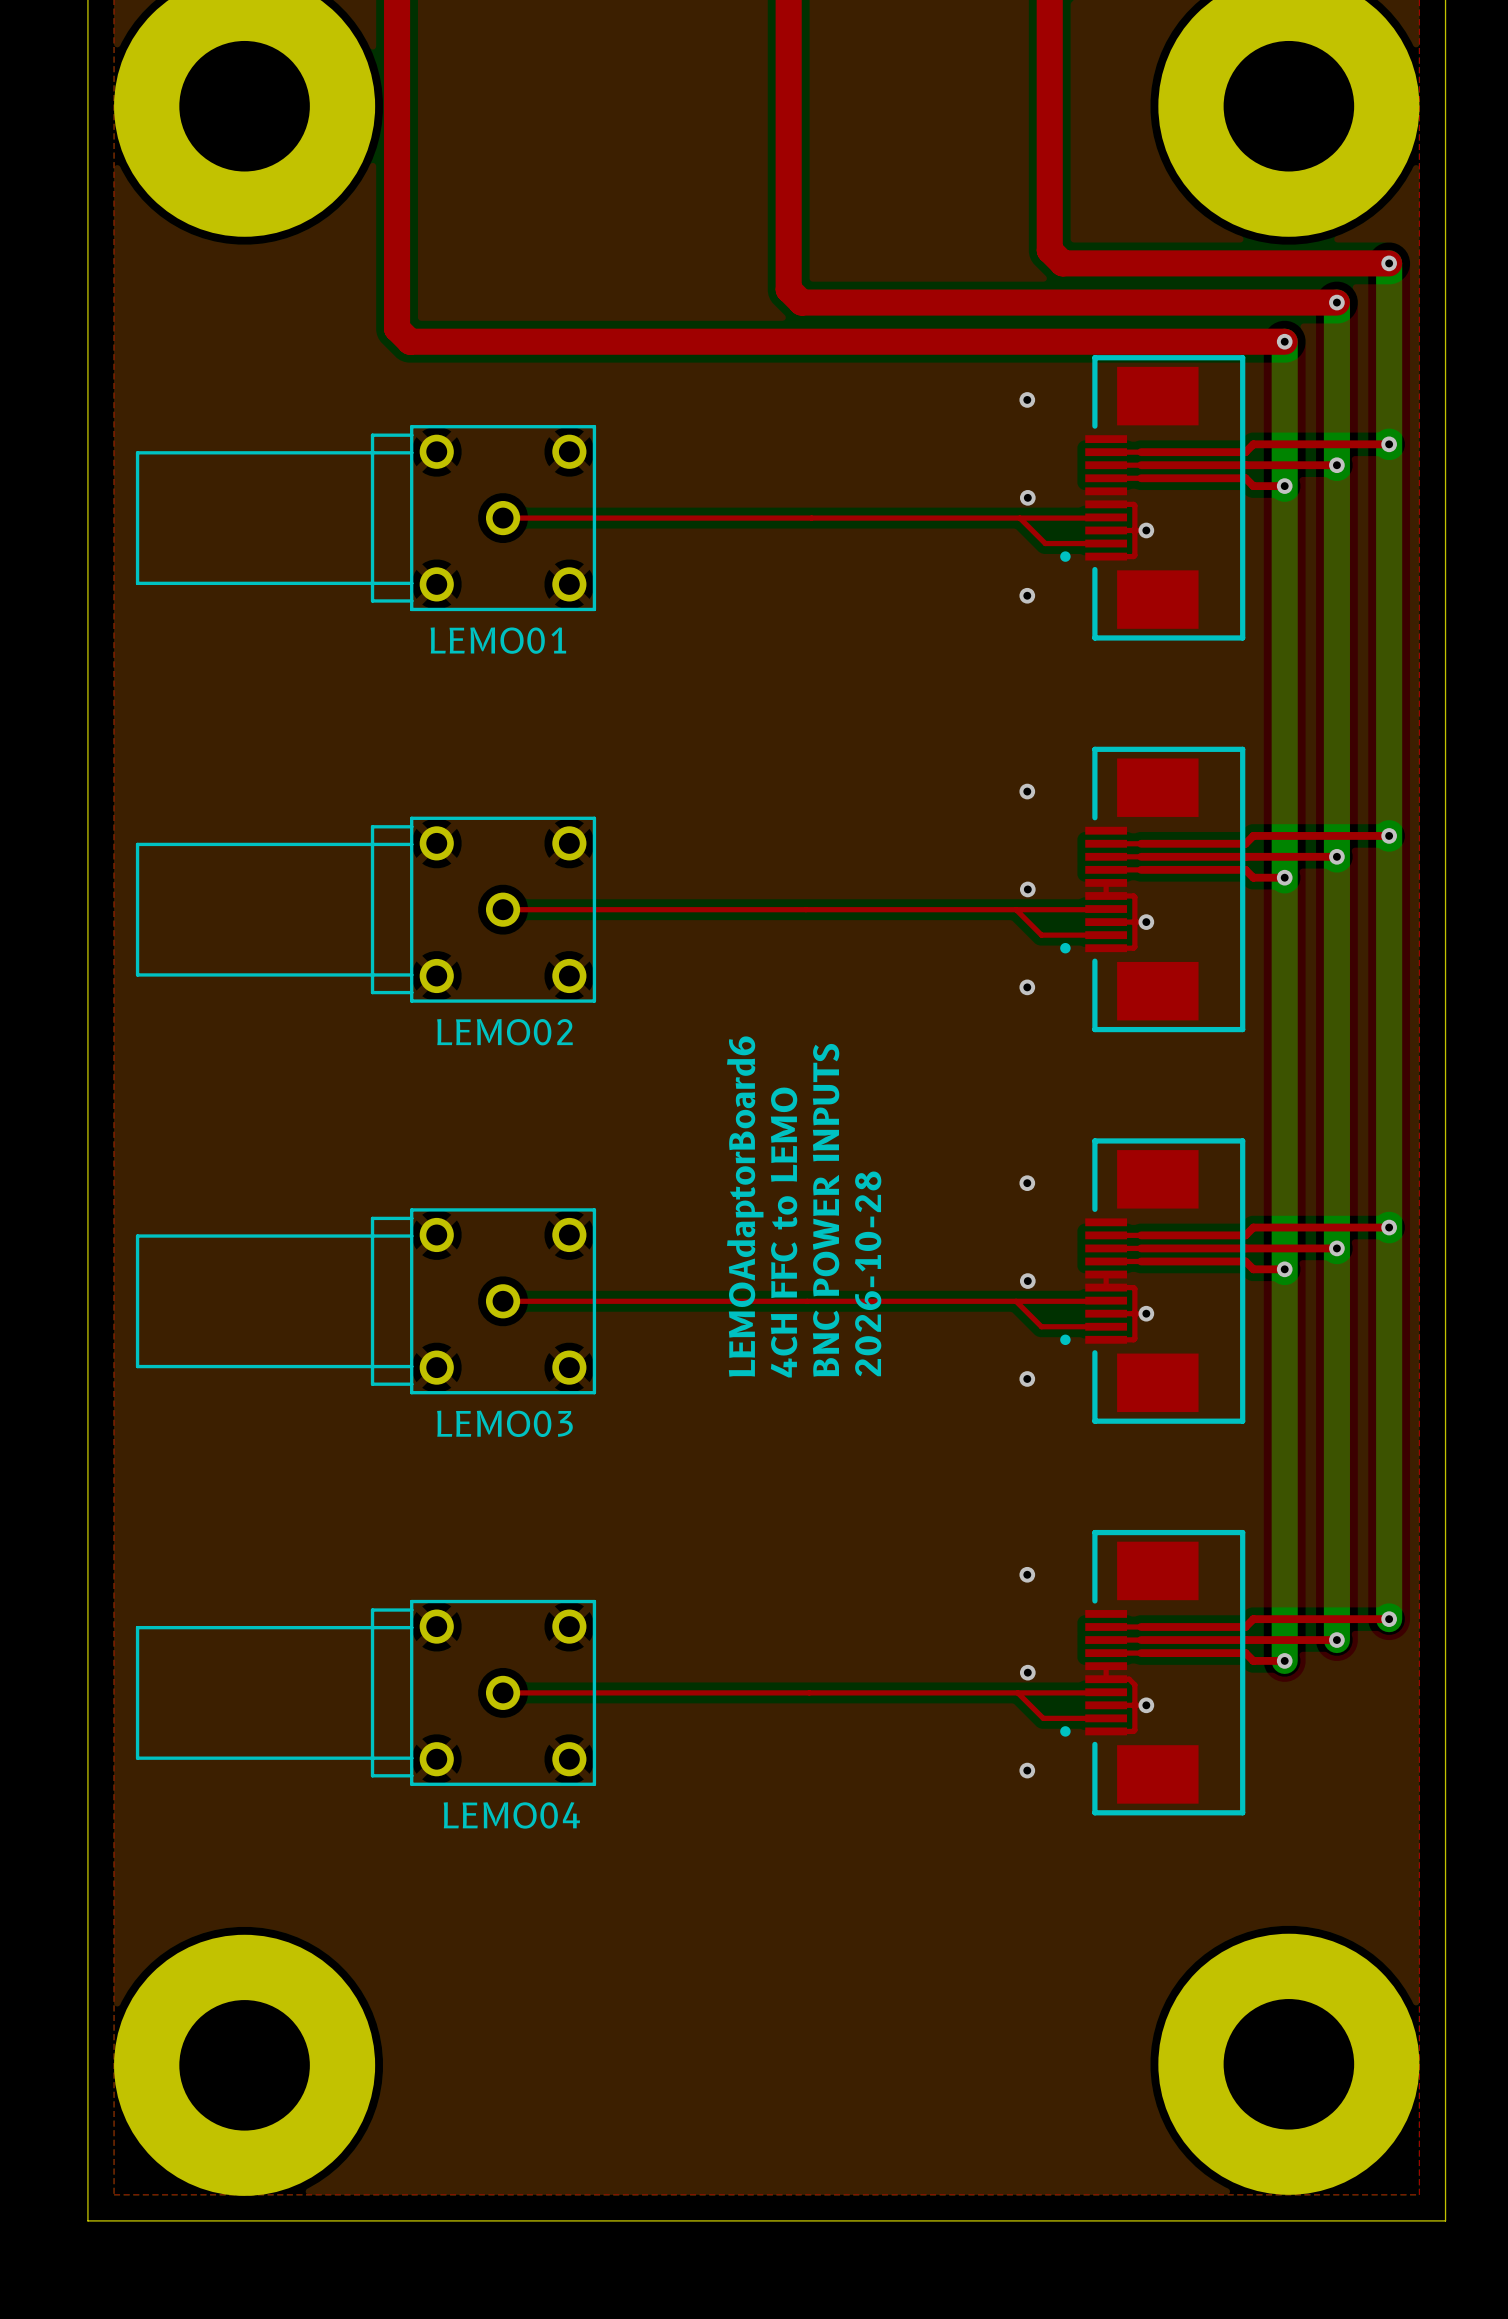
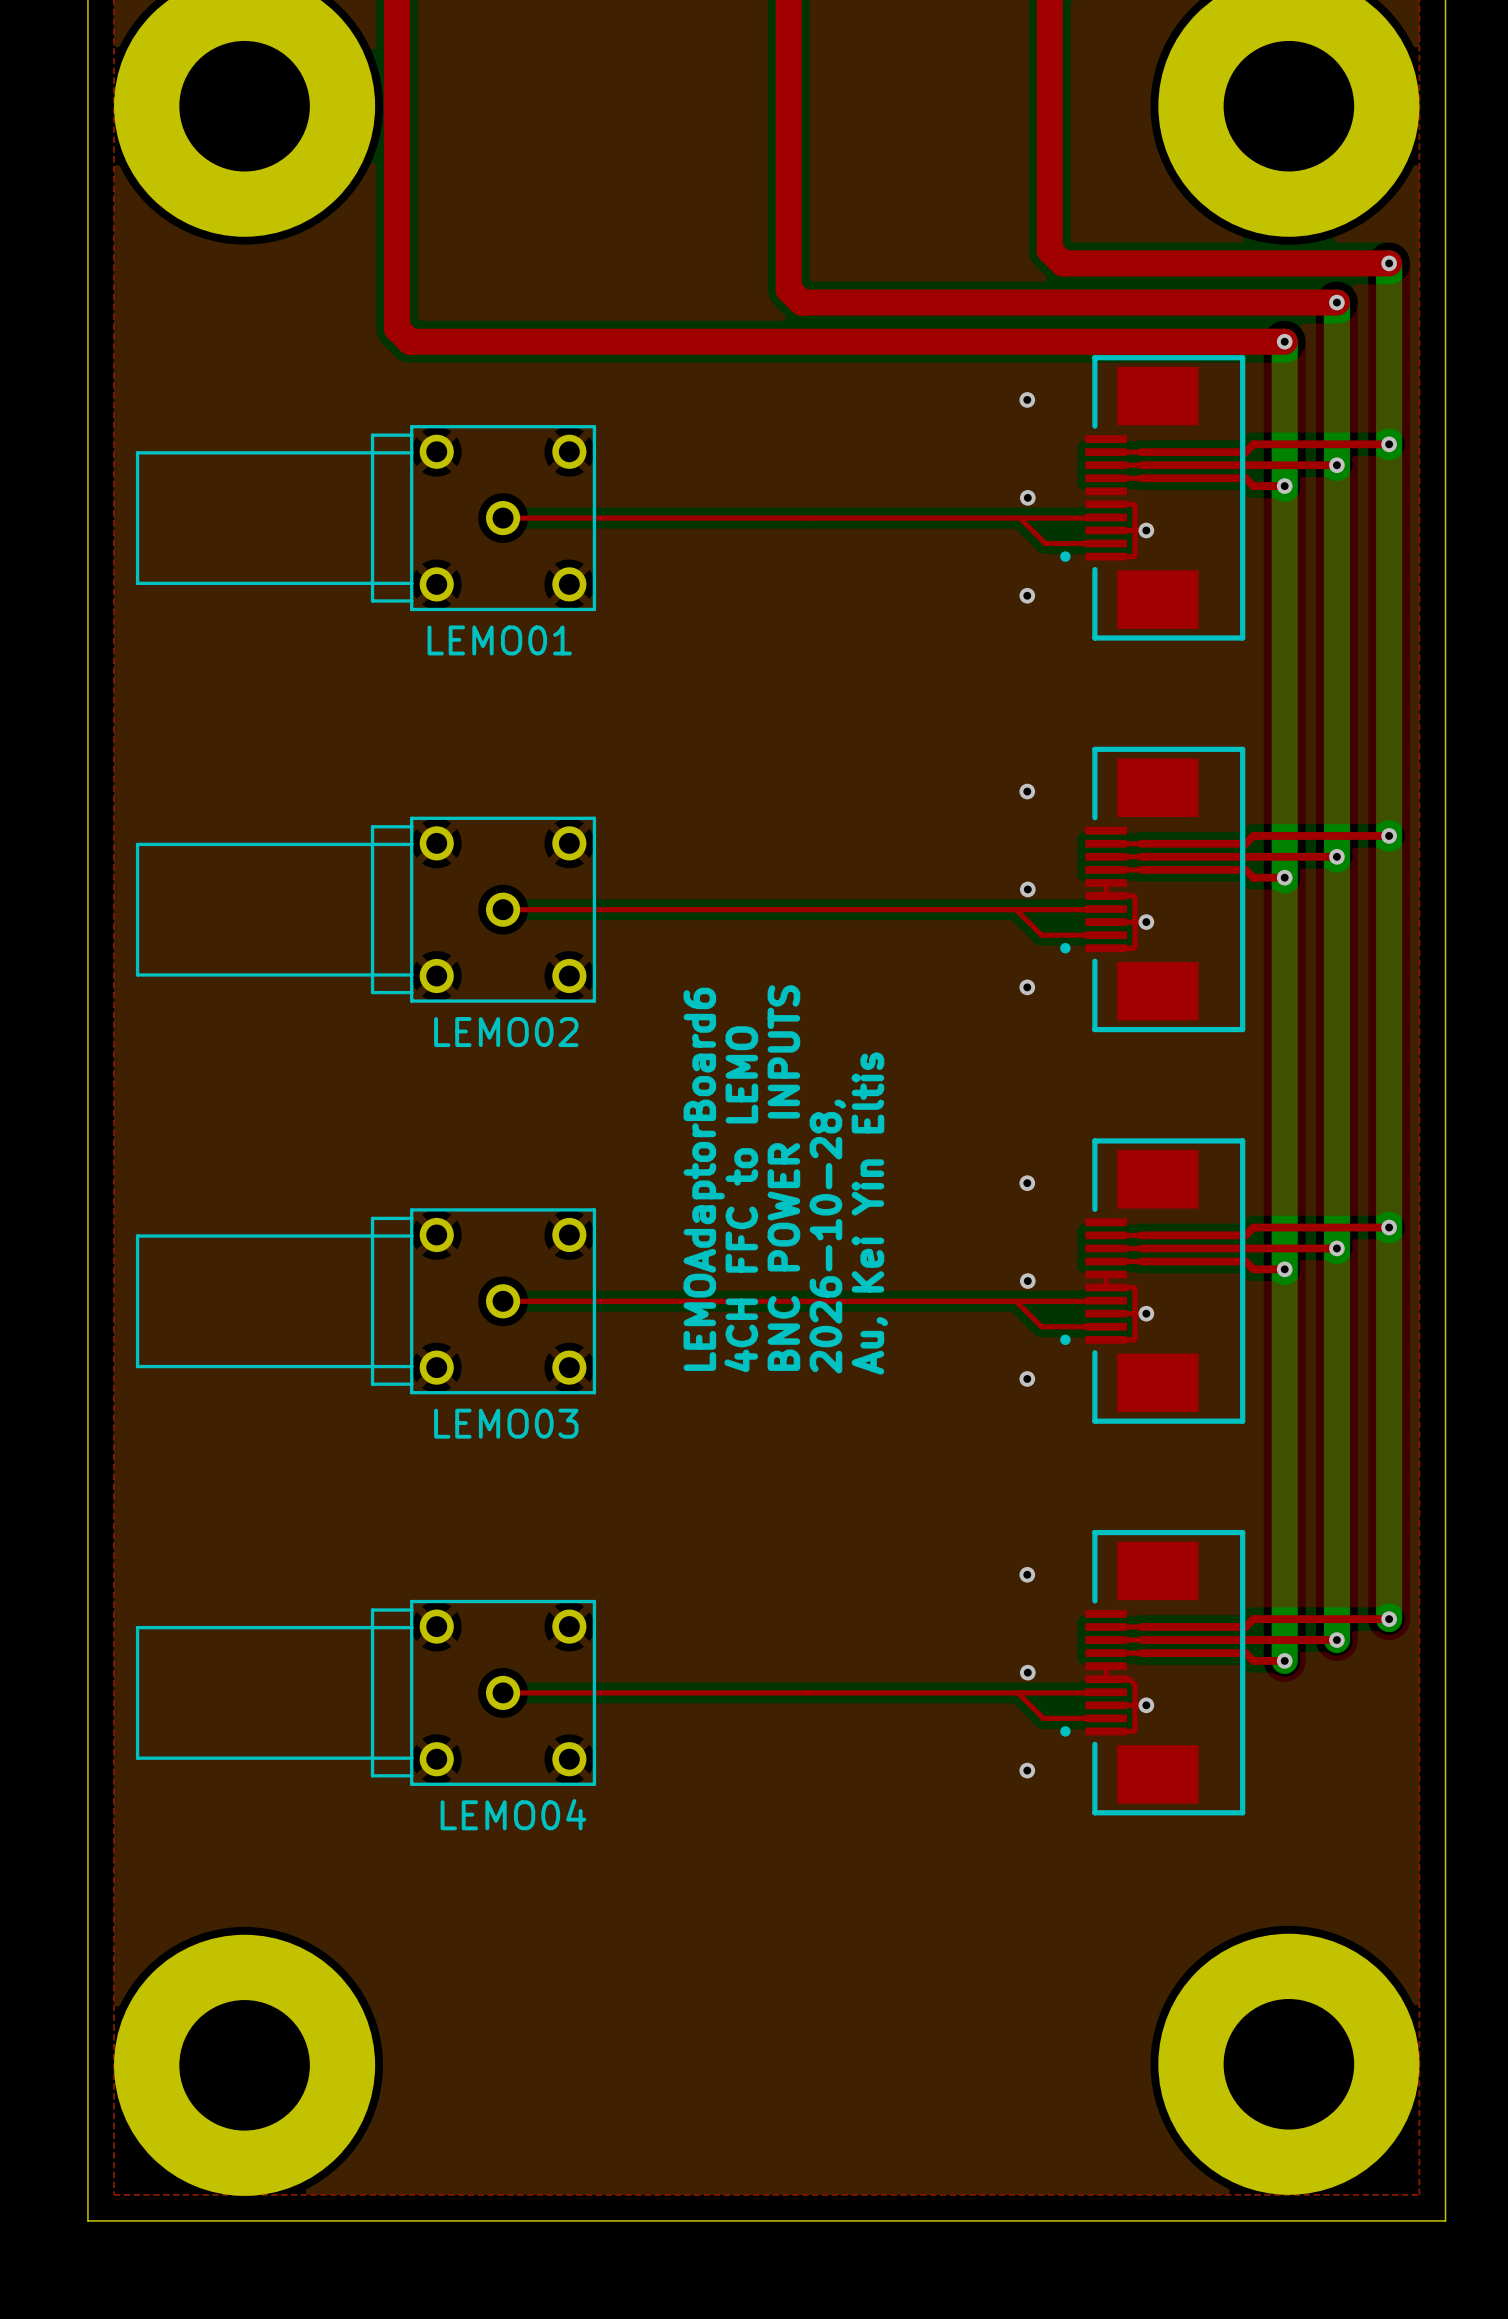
text: none -> LEMOAdaptorBoard6 (704, 1179)
text: LEMOAdaptorBoard6 (745, 1206) -> 4CH FFC to LEMO (741, 1199)
text: BNC POWER INPUTS (826, 1210) -> 2026-10-28, (827, 1236)
text: 4CH FFC to LEMO (784, 1232) -> BNC POWER INPUTS (783, 1178)
text: 2026-10-28 (868, 1273) -> Au, Kei Yin Eltis (869, 1213)

